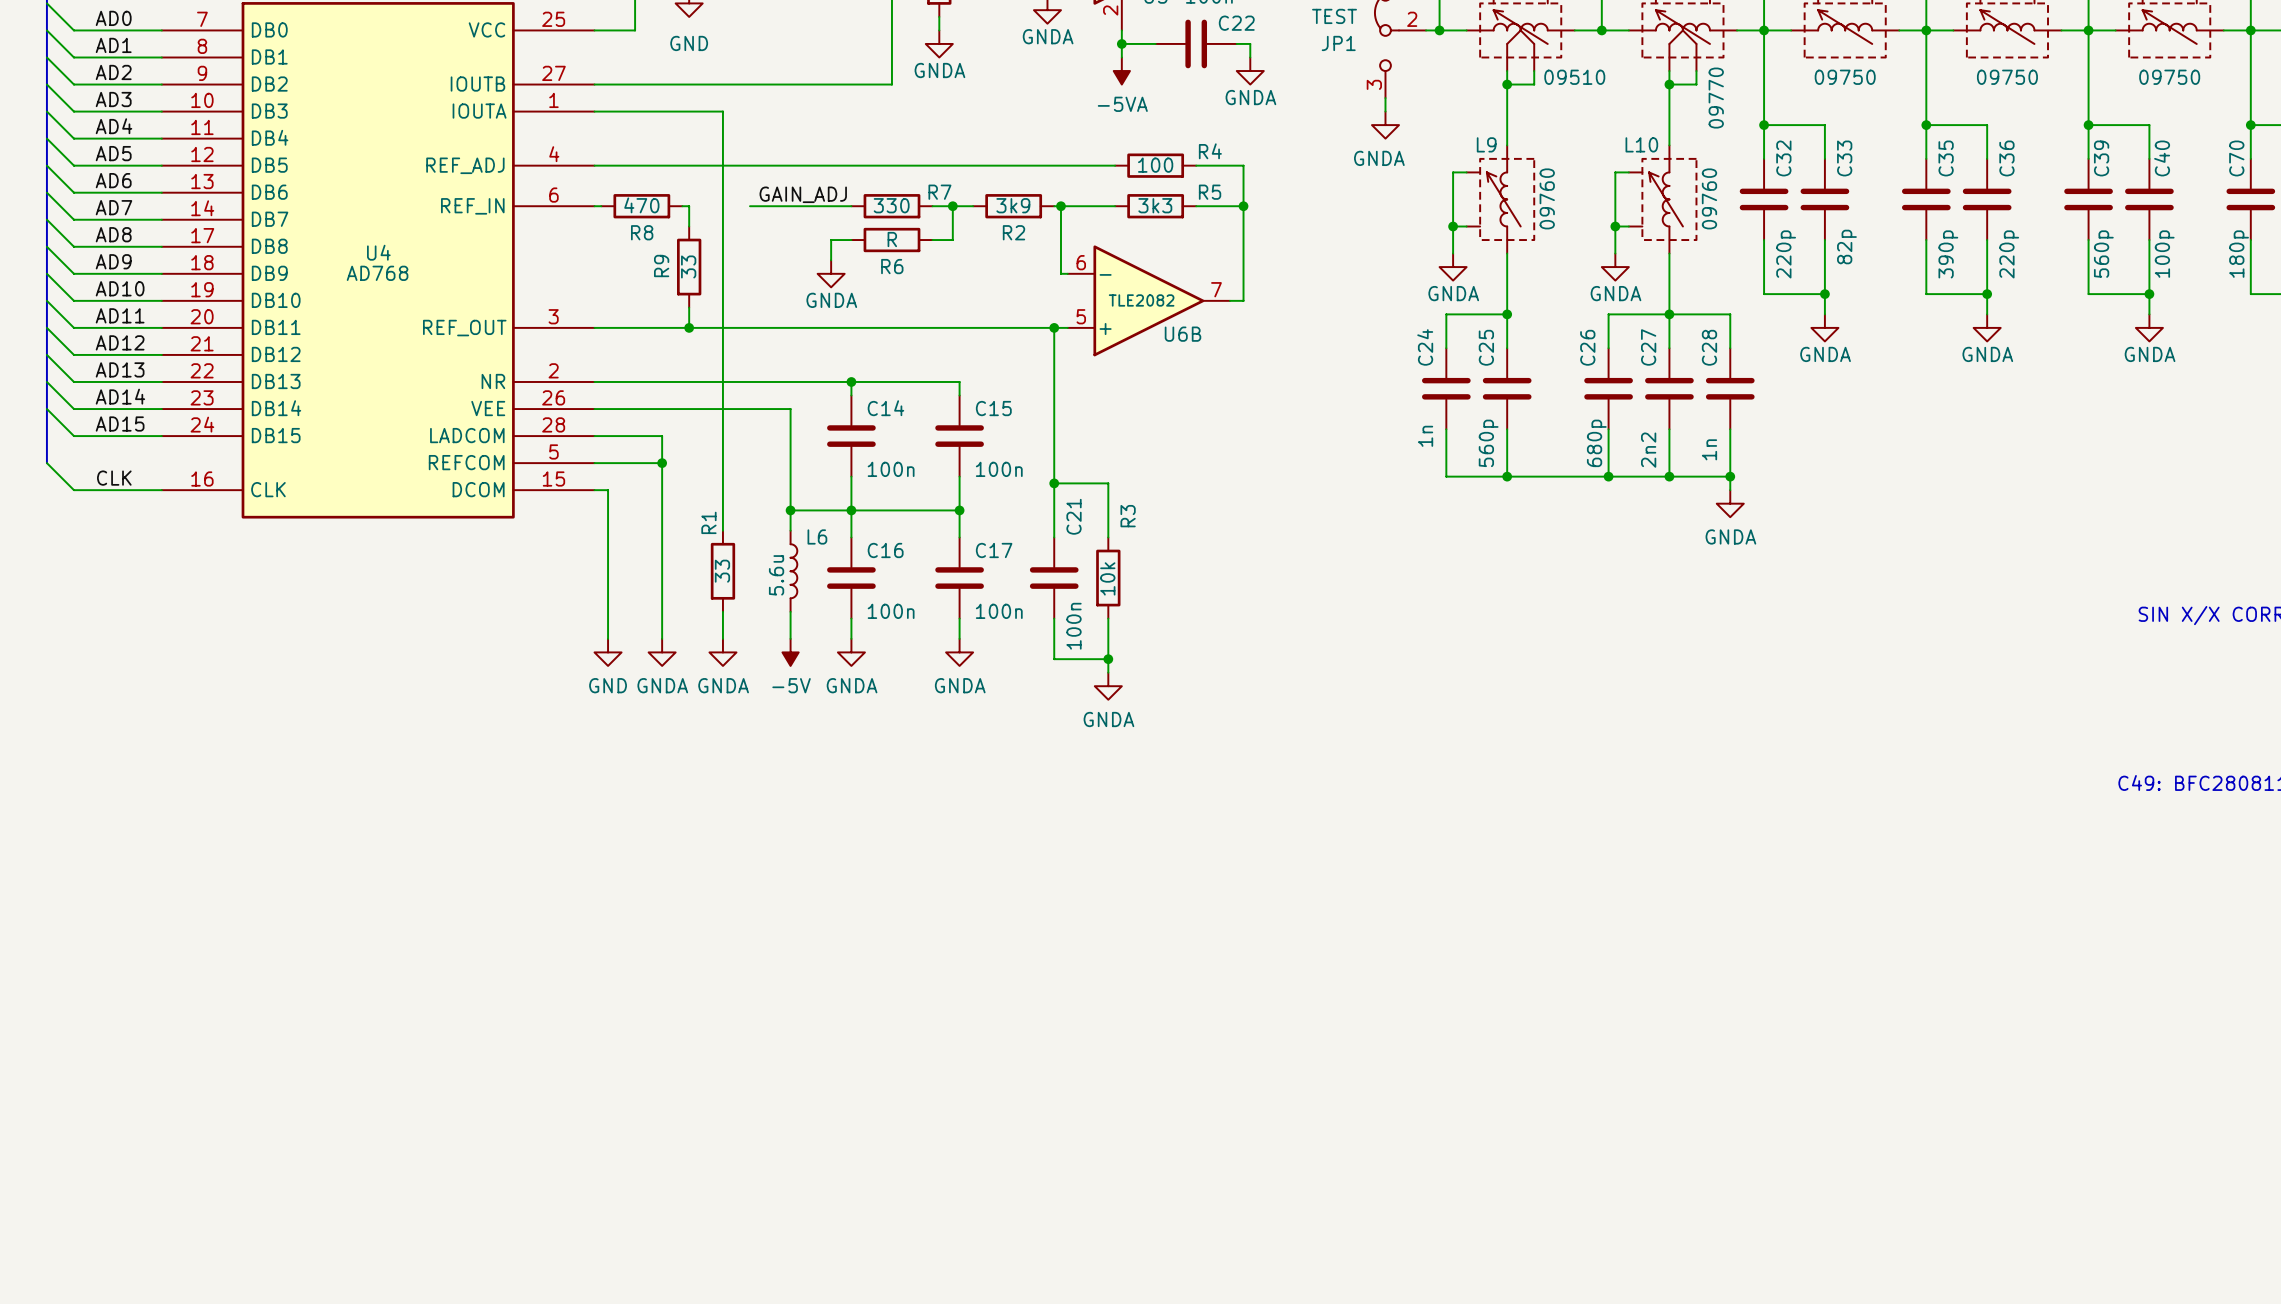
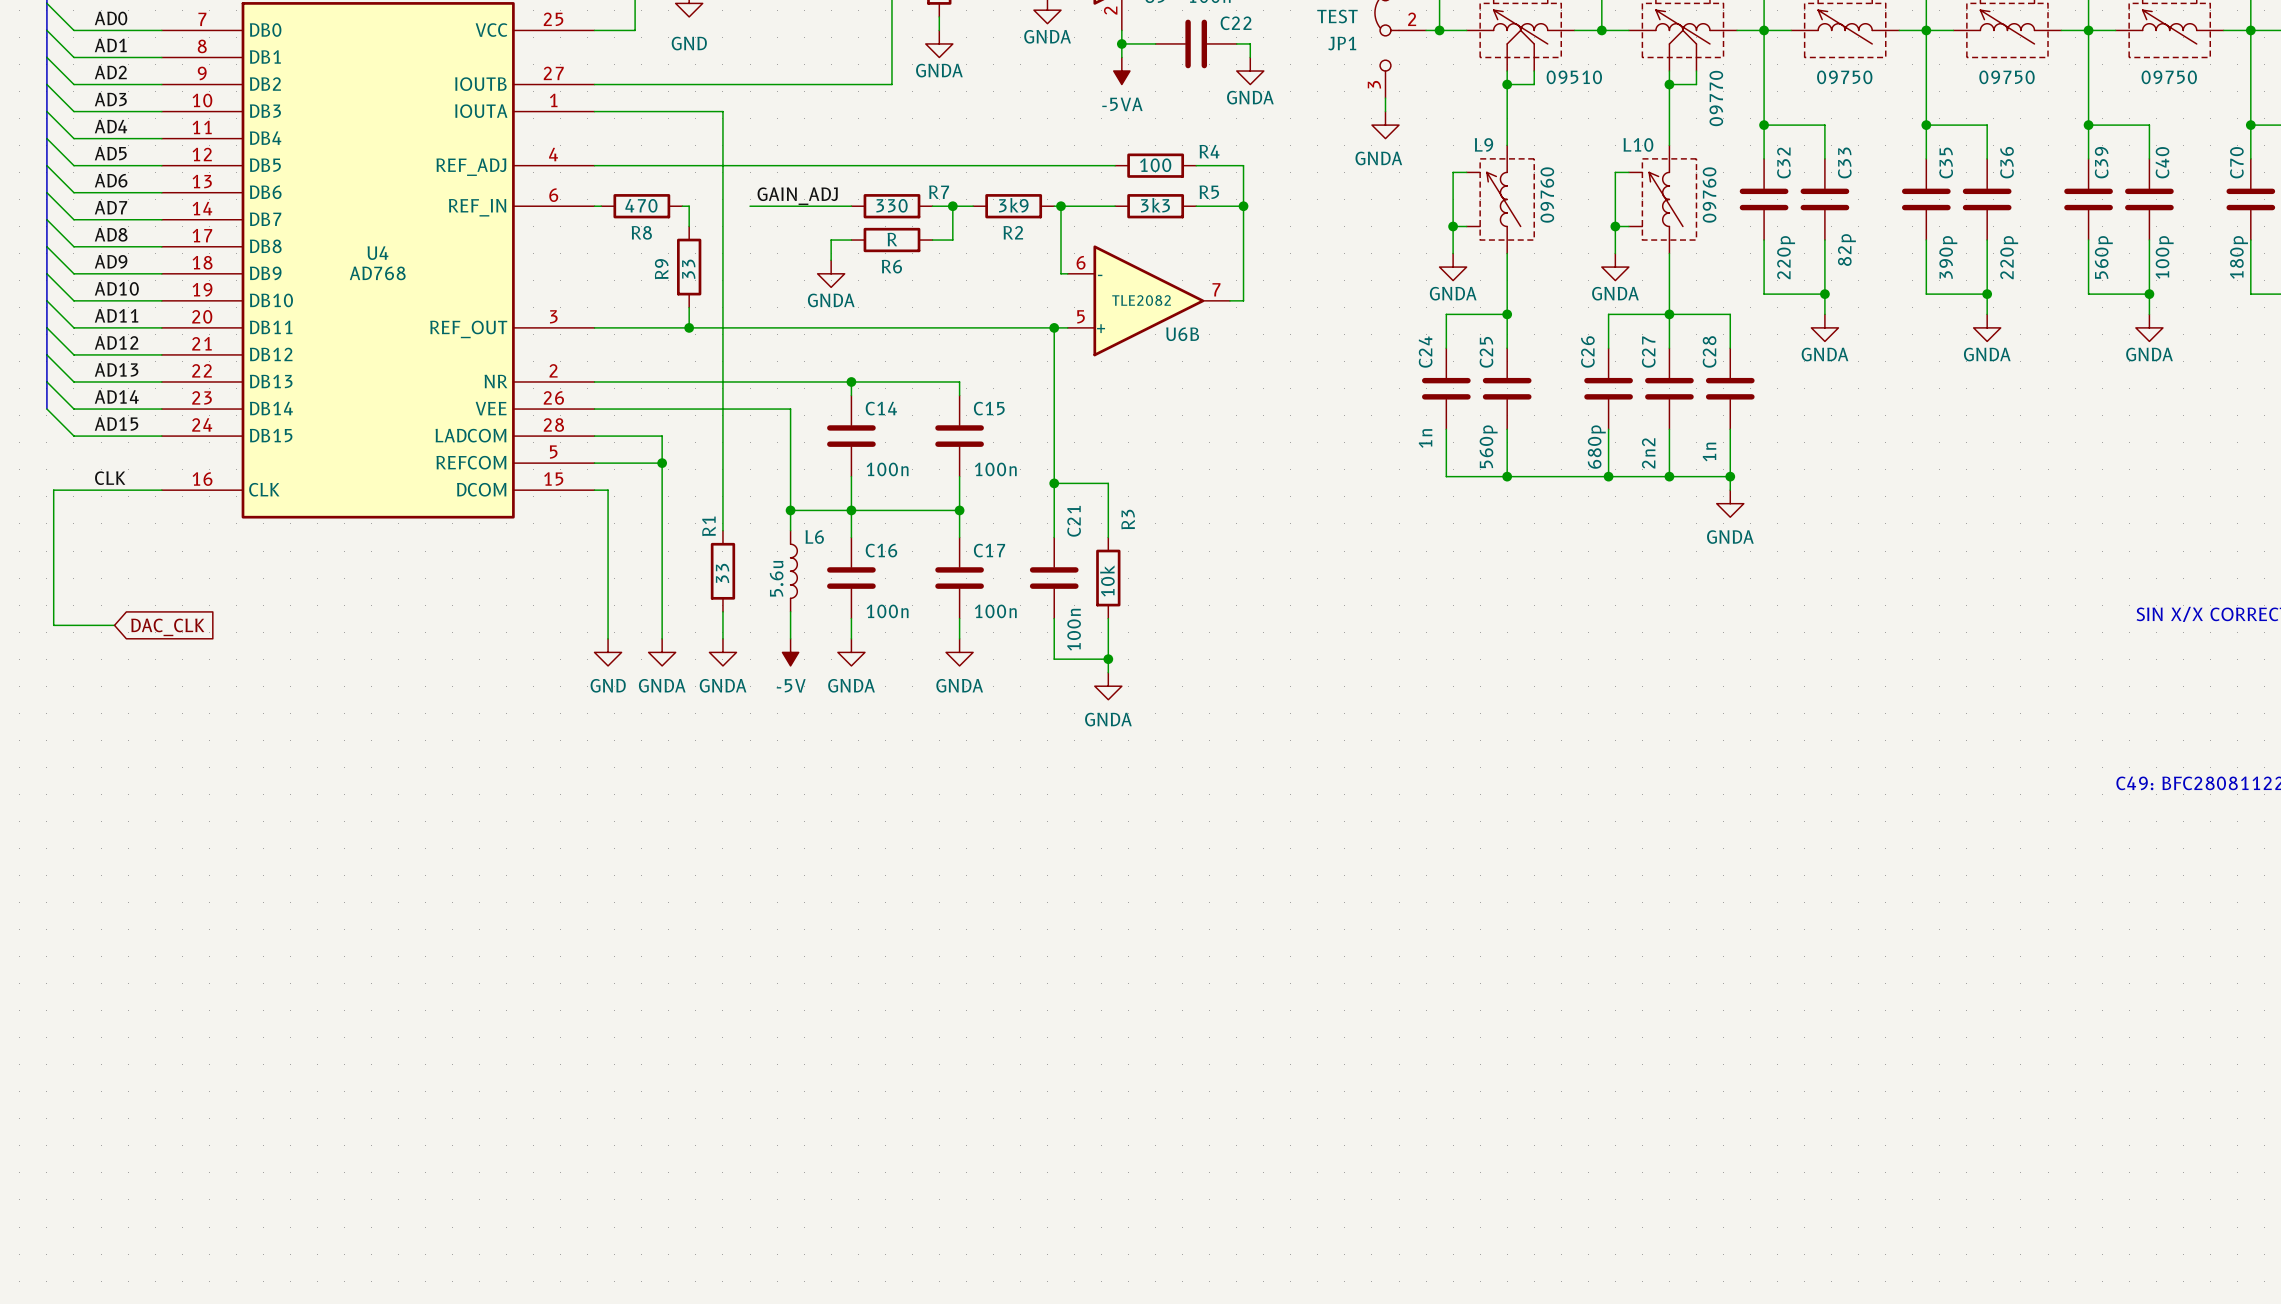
bus: (46, 409) (46, 463) -> none
wire: (46, 463) (73, 490) -> (114, 625) (53, 625) (53, 490) (73, 490)
global label: none -> DAC_CLK (167, 627)

